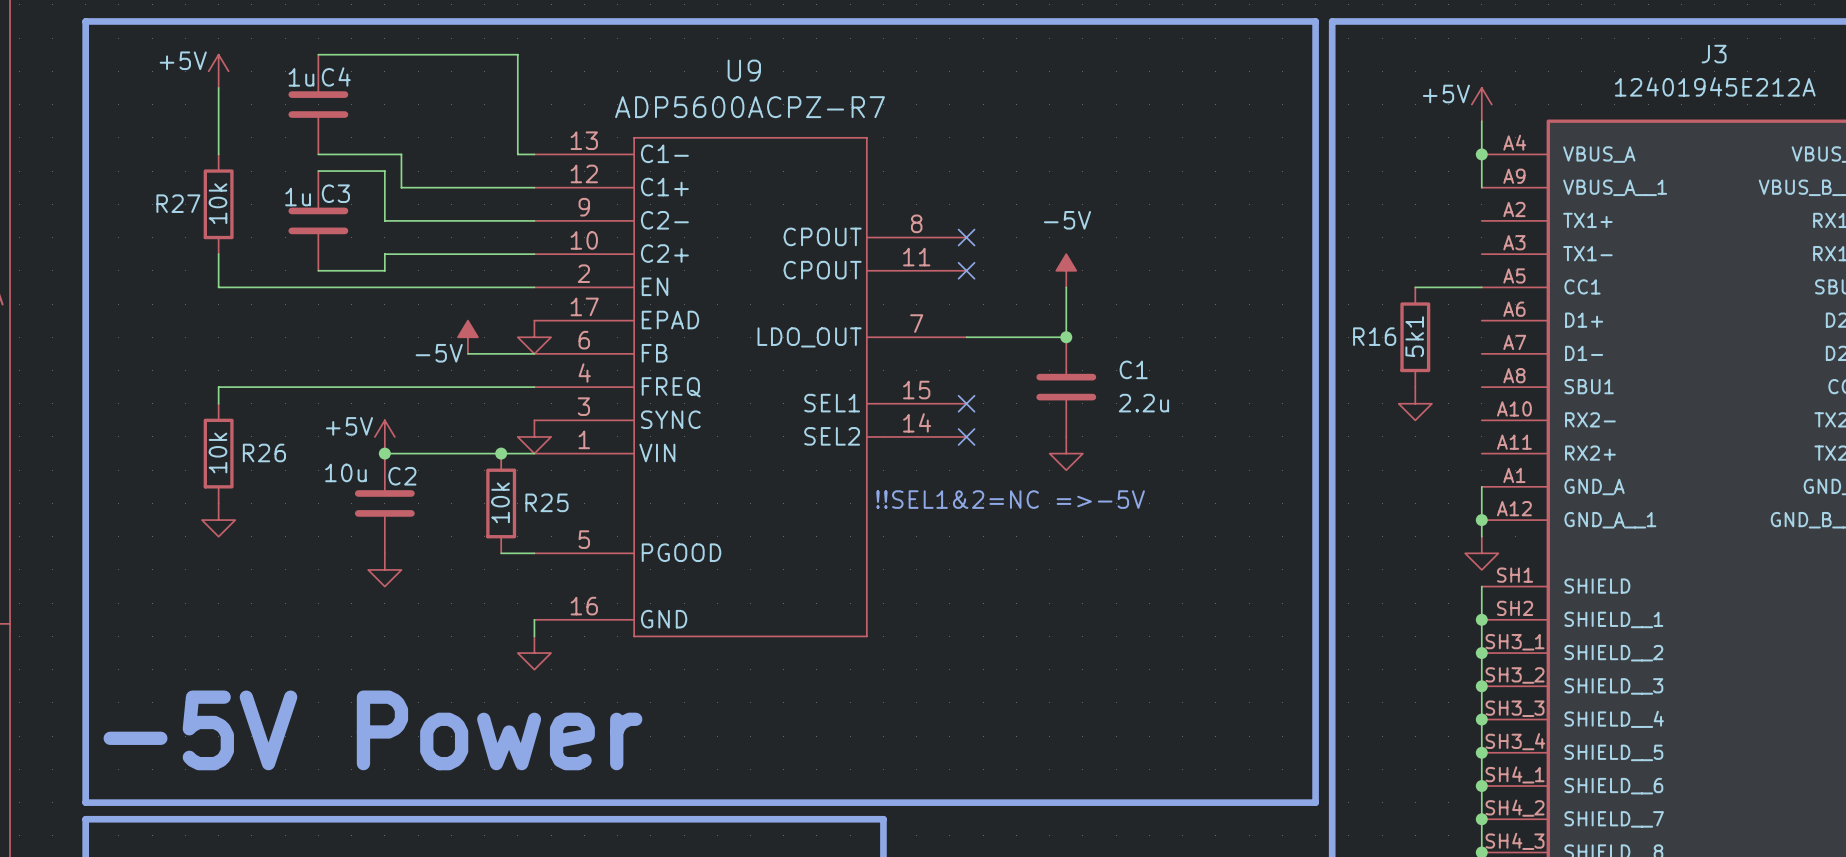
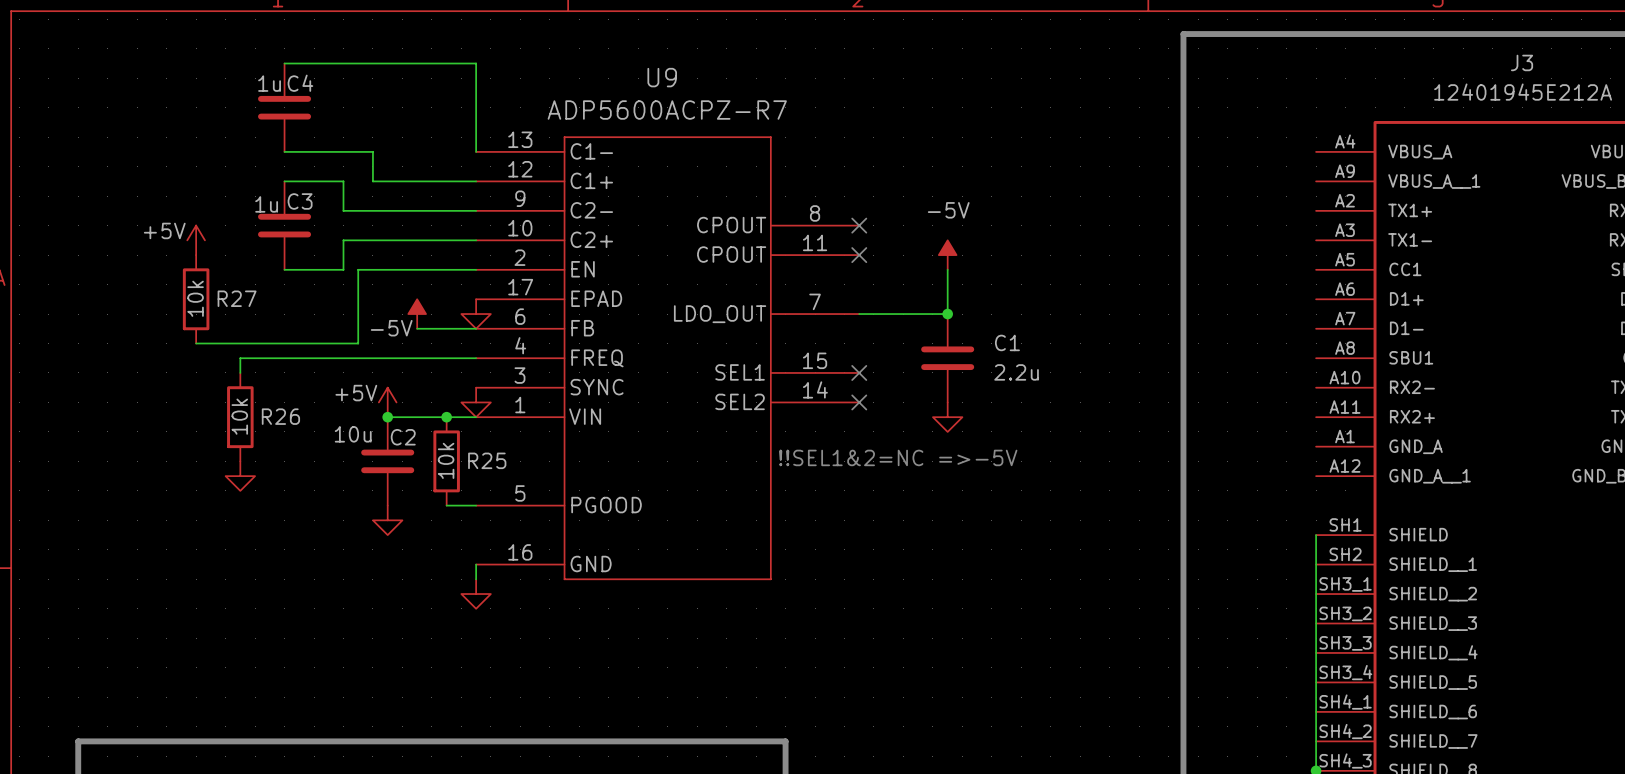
line: (85, 21) (1315, 21) (1315, 802) (85, 802) (85, 21) -> none
wire: (517, 54) (517, 154) (534, 154) -> (461, 63) (476, 63) (476, 151)
power symbol: +5V (218, 71) -> none
wire: (218, 87) (218, 154) -> none
power symbol: +5V (1481, 104) -> none
wire: (1481, 121) (1481, 187) -> none
wire: (401, 154) (401, 187) (418, 187) -> (358, 151) (372, 151) (372, 181)
junction: (1481, 154) -> none
wire: (318, 171) (384, 171) (384, 187) -> (284, 181) (343, 181)
R27 name position: R27 (178, 203) -> R27 (237, 298)
R27 position: (218, 204) -> (196, 299)
C3 position: (318, 220) -> (284, 225)
wire: (218, 254) (218, 287) (318, 287) -> none
power symbol: none -> +5V (196, 240)
wire: (318, 270) (384, 270) -> none
wire: (384, 287) (401, 287) -> (343, 269) (343, 255)
wire: none -> (358, 269) (358, 343) (196, 343)
wire: (1415, 287) (1481, 287) -> none
R16: 5k1 (1415, 337) -> none
wire: (268, 387) (218, 387) (218, 403) -> (240, 358) (240, 372)
power symbol: (1415, 403) -> none
power symbol position: +5V (384, 436) -> +5V (387, 402)
R26 position: (218, 453) -> (240, 417)
wire: (384, 453) (434, 453) -> none
junction position: (384, 453) -> (387, 417)
wire: (1481, 486) (1481, 536) -> none
C2 position: (384, 503) -> (387, 461)
power symbol position: (218, 520) -> (240, 476)
junction: (1481, 520) -> none
power symbol: (1481, 553) -> none
power symbol position: (384, 569) -> (387, 520)
junction: (1481, 619) -> none
junction: (1481, 653) -> none
junction: (1481, 686) -> none
junction: (1481, 719) -> none
text: -5V Power (372, 730) -> none
junction: (1481, 752) -> none
junction: (1481, 786) -> none
junction: (1481, 819) -> none

